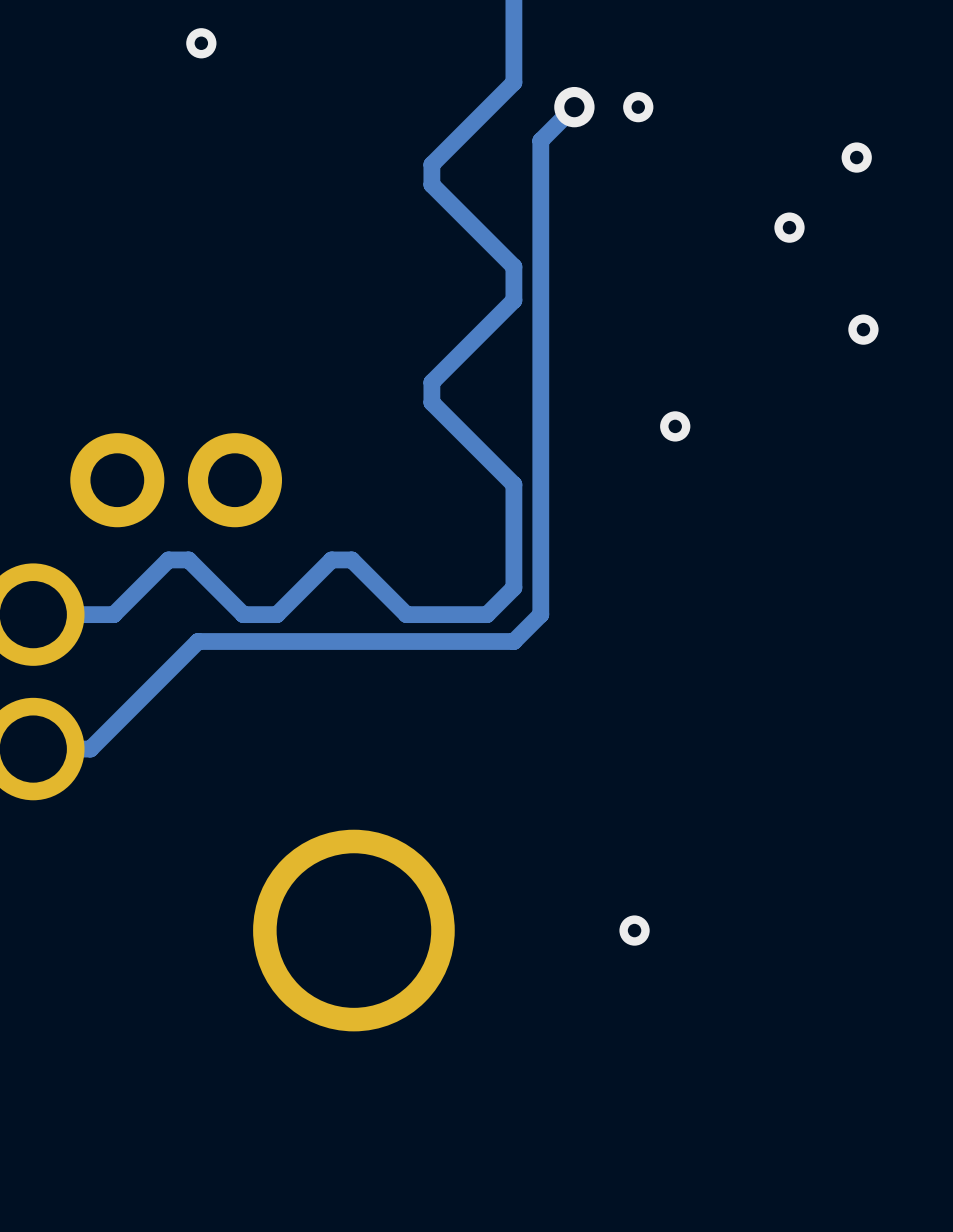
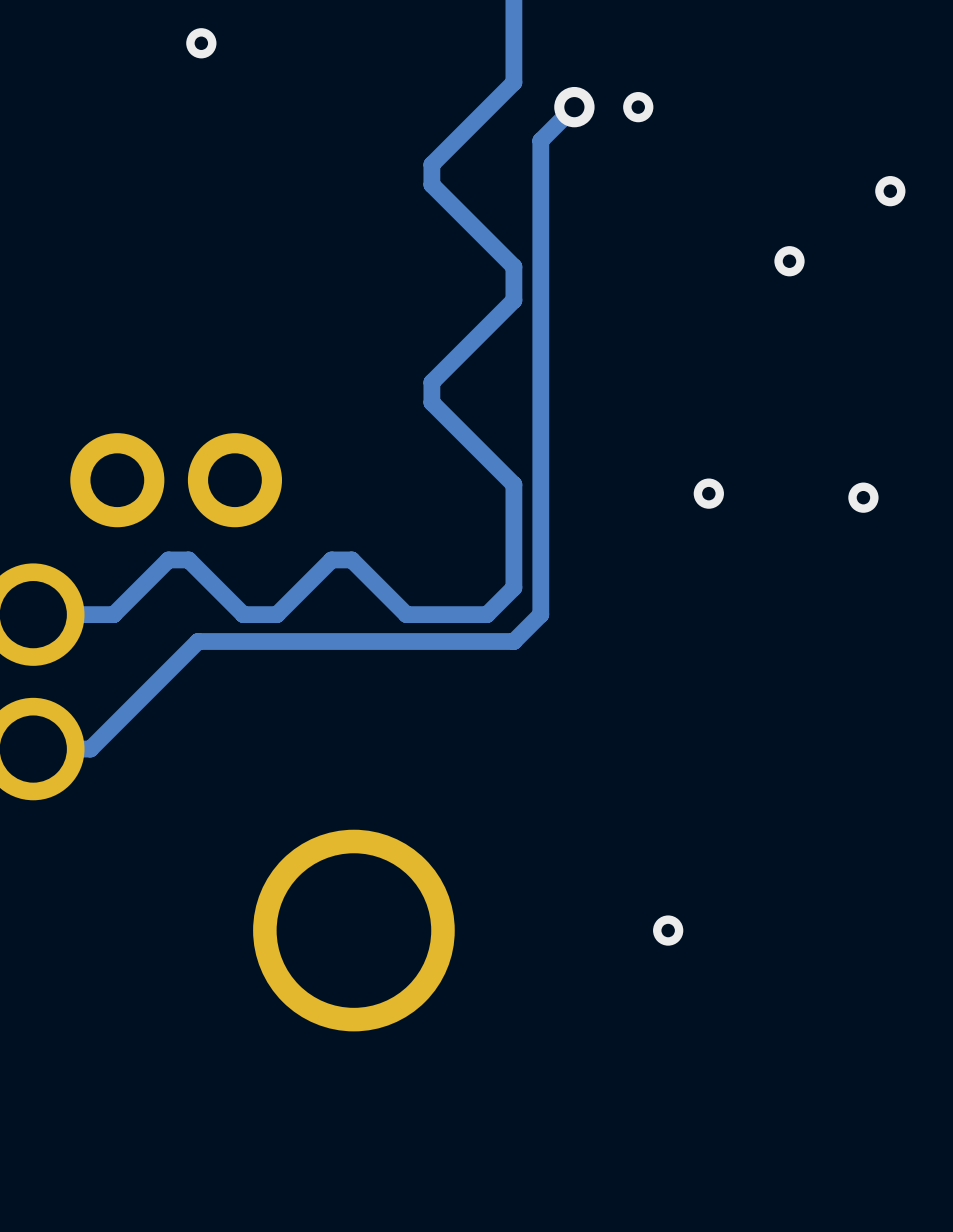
via position: (856, 157) -> (890, 191)
via position: (789, 227) -> (789, 261)
via: (863, 329) -> none
via position: (675, 426) -> (708, 493)
via: none -> (863, 497)
via position: (634, 930) -> (668, 930)

